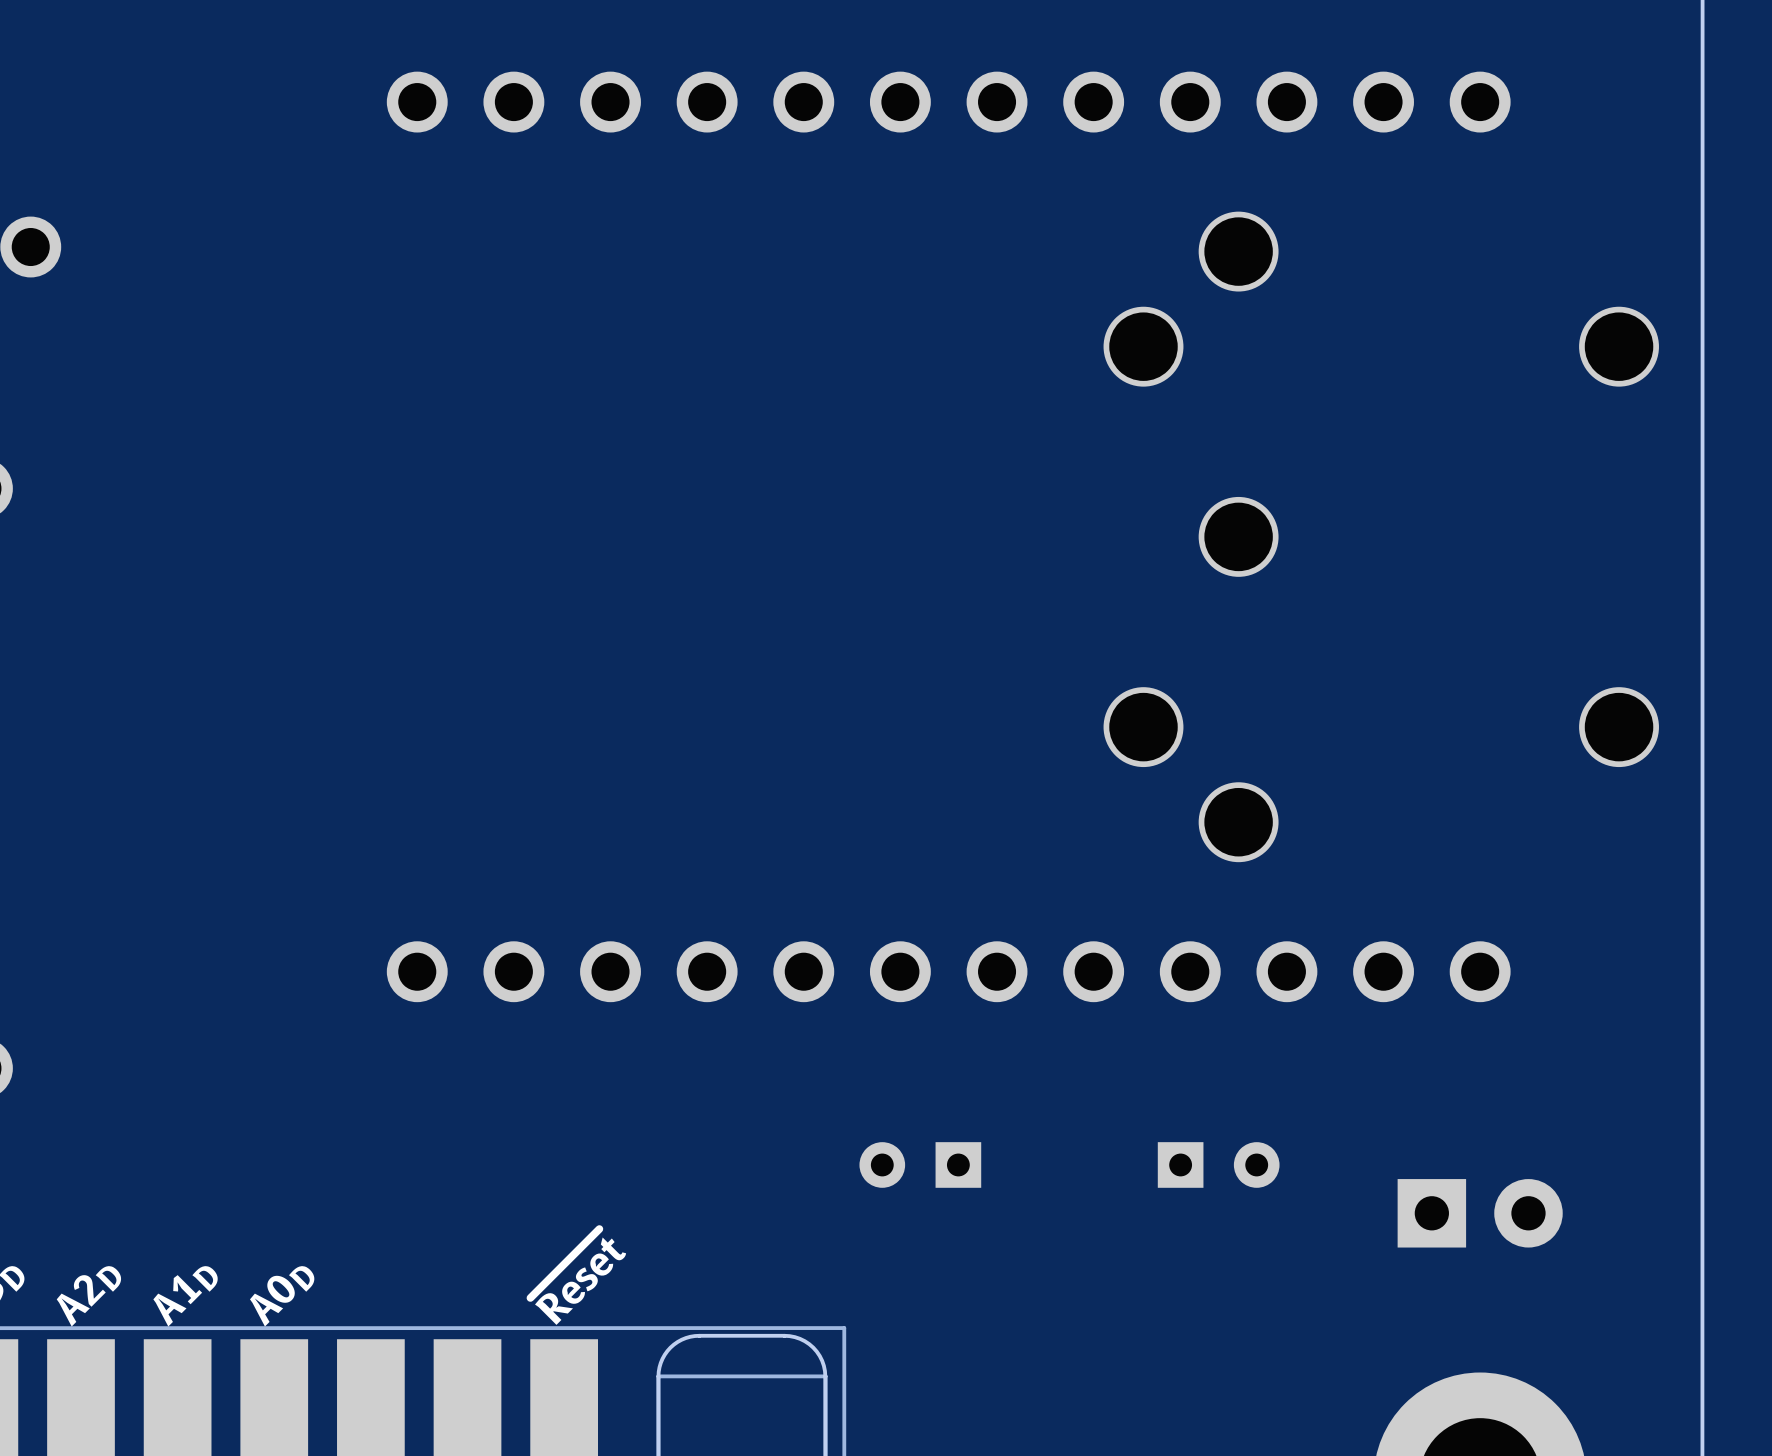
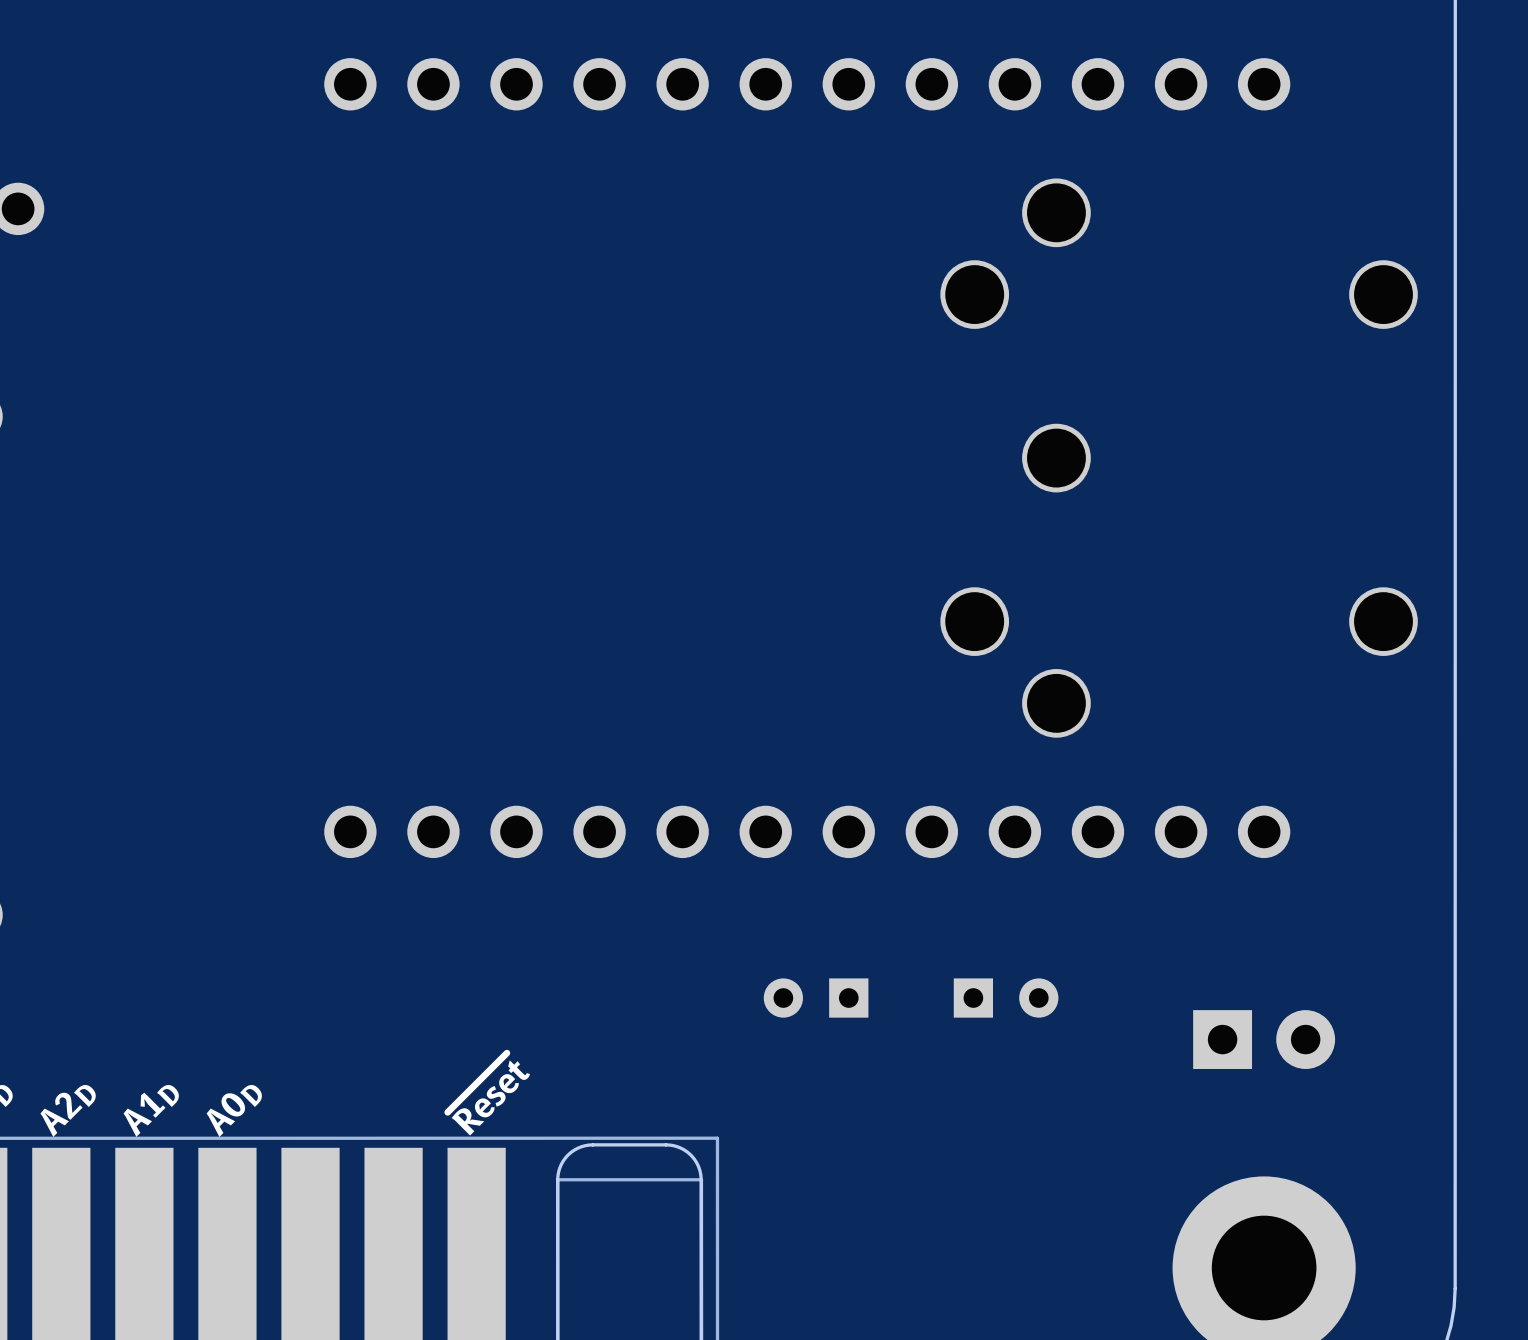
part position: (920, 1164) -> (816, 998)
part position: (1218, 1164) -> (1006, 998)

